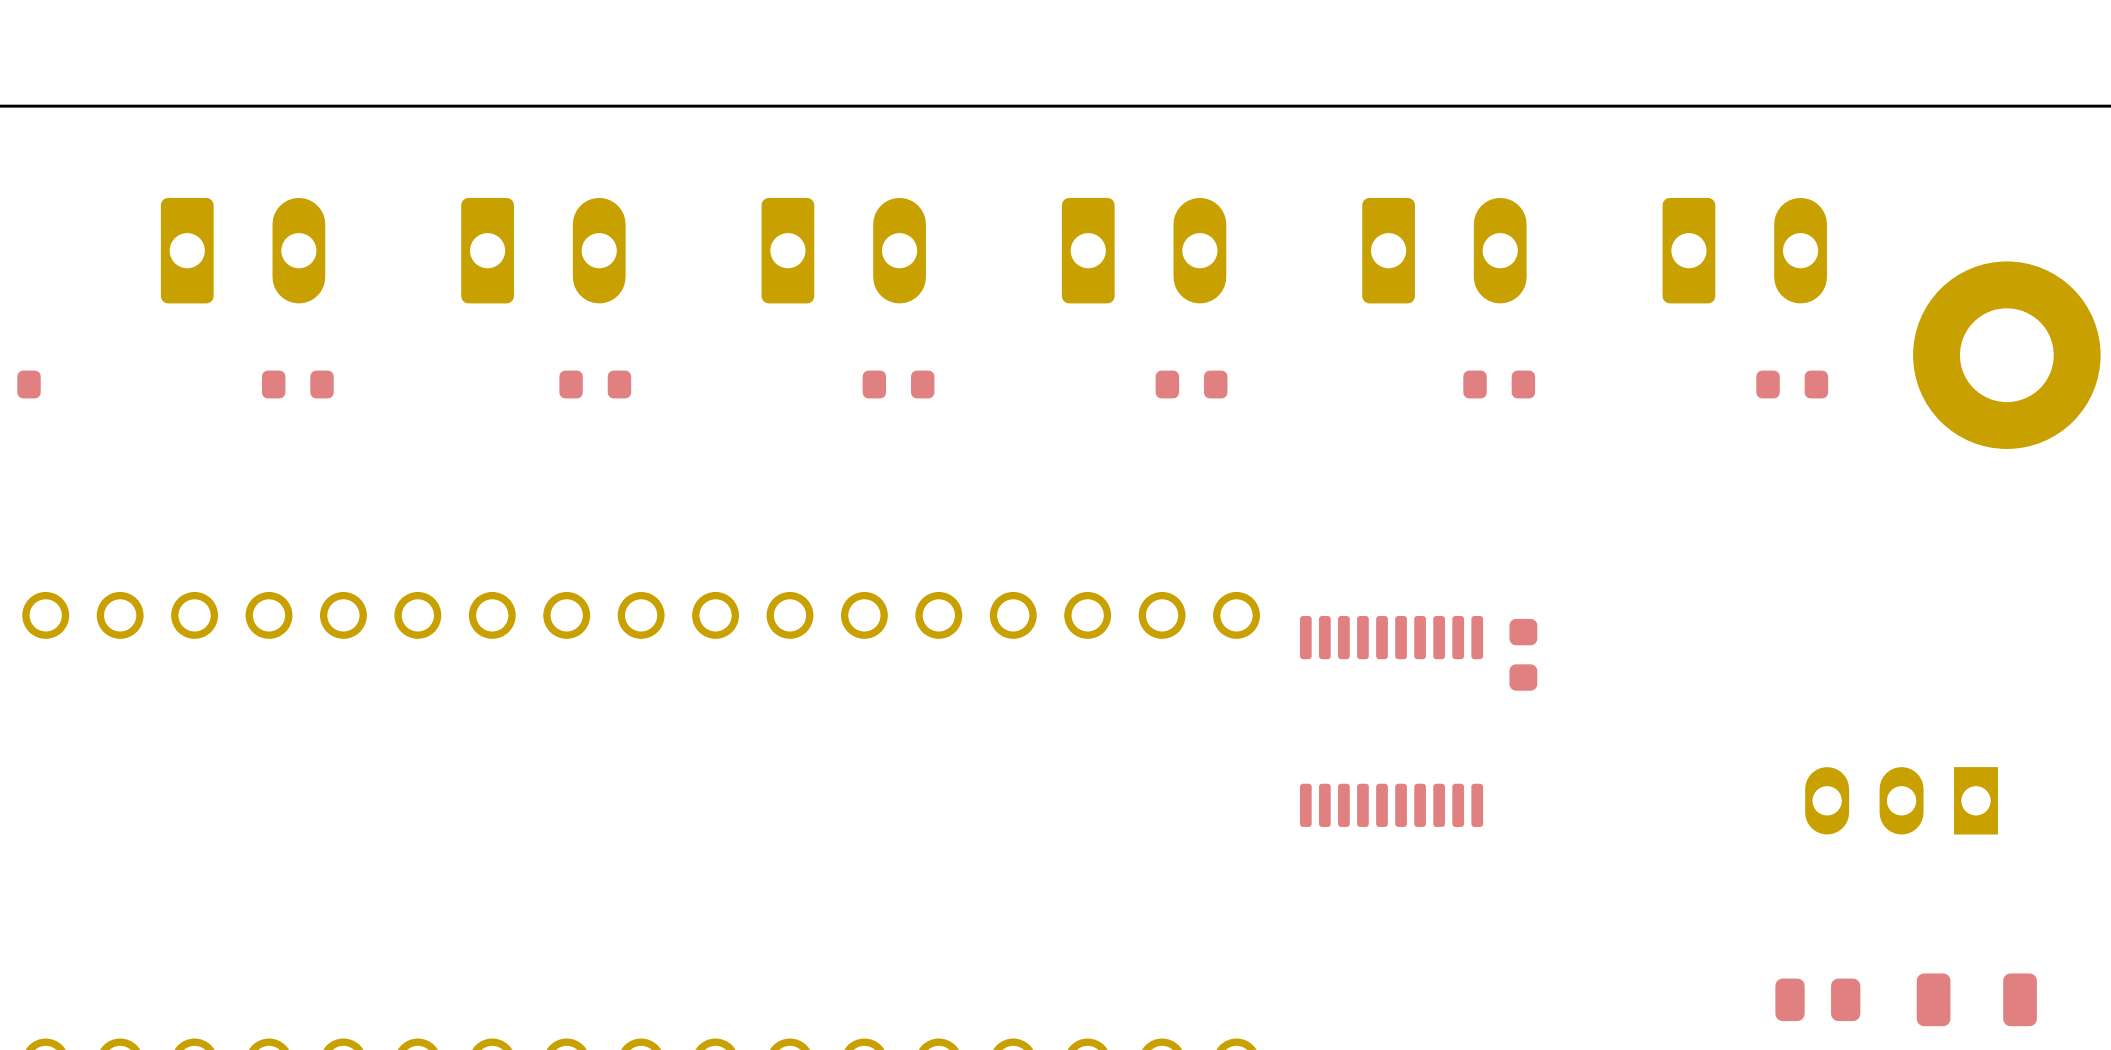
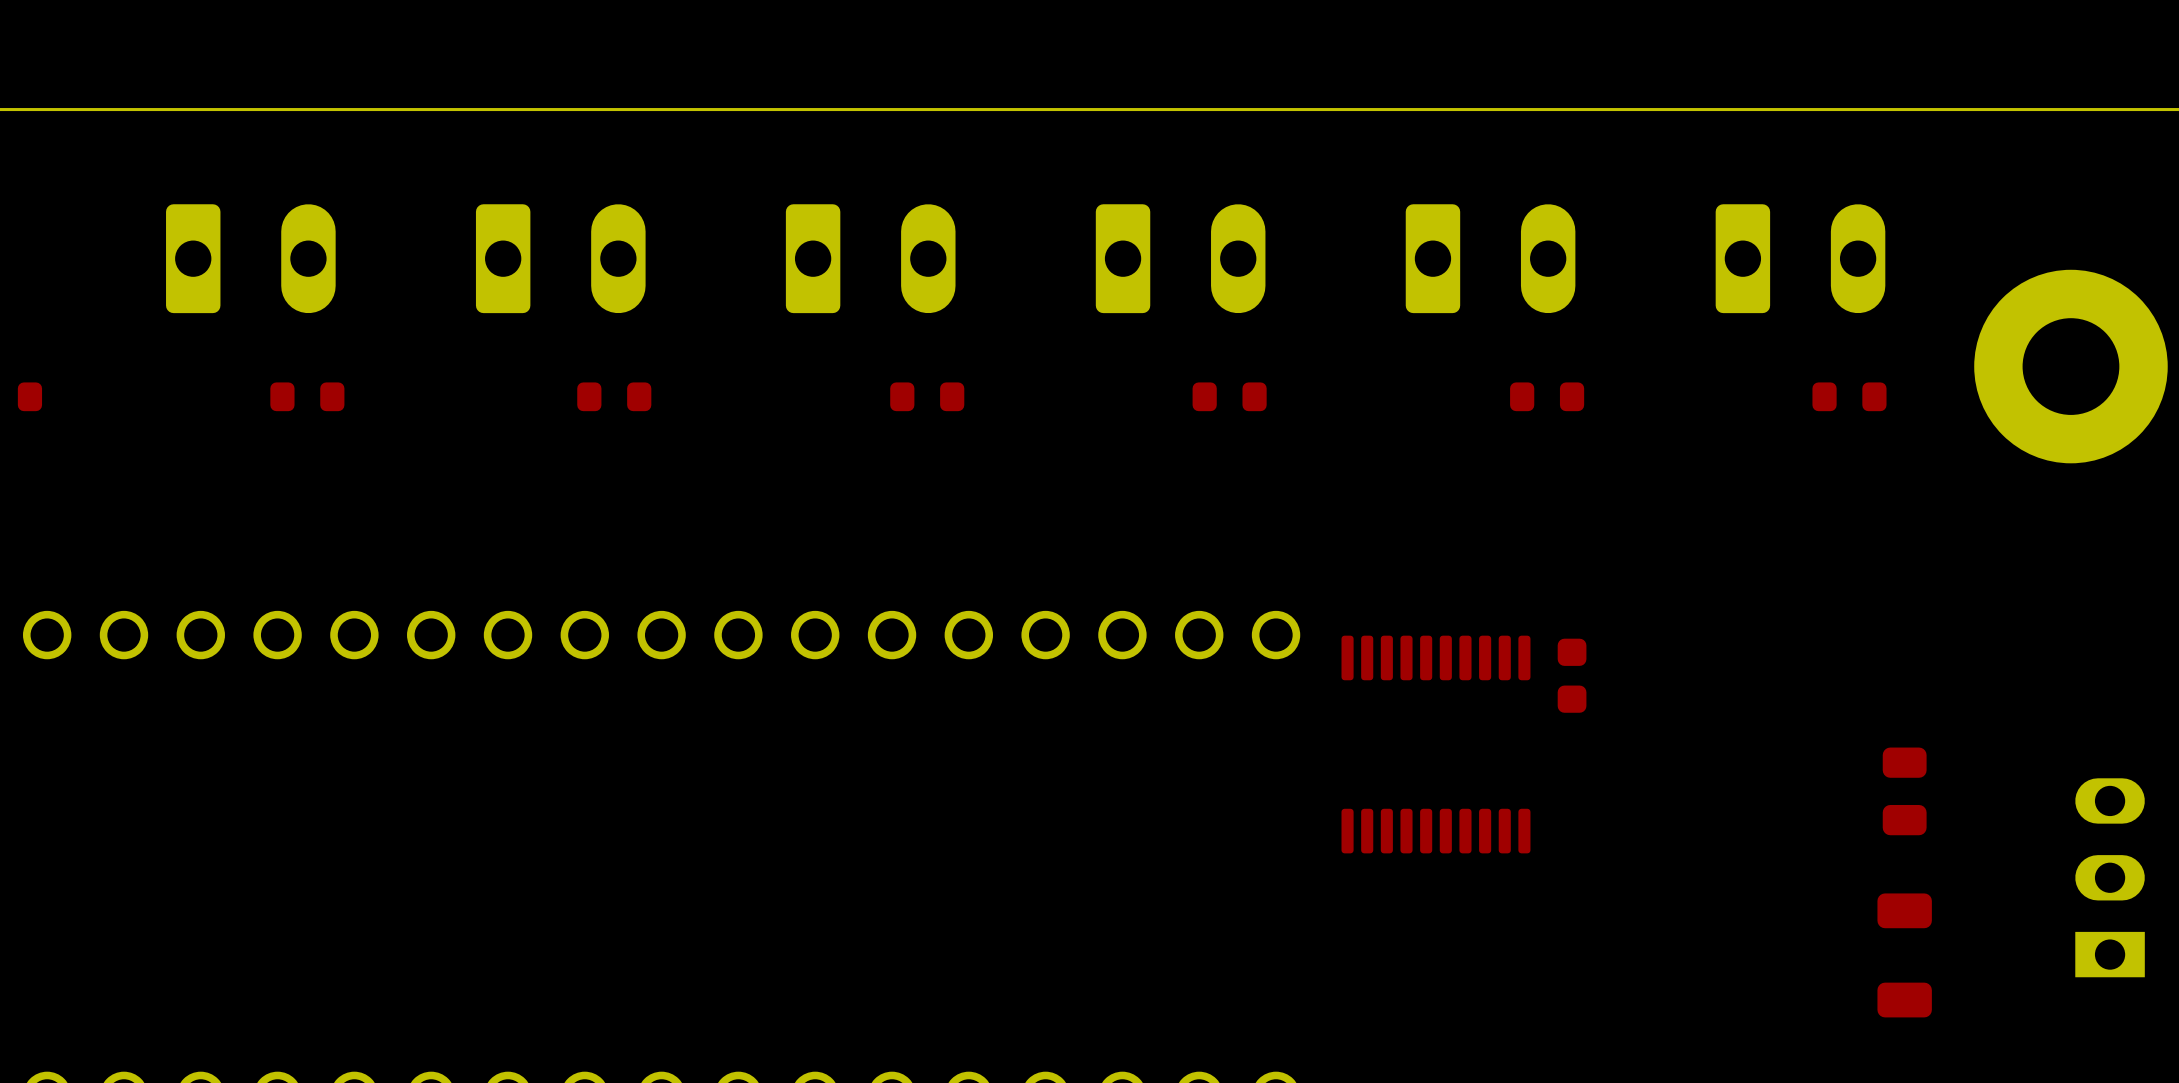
part rotation: 0° (1901, 800) -> 90° clockwise (2110, 877)
part position: (1901, 800) -> (2110, 877)
part rotation: 0° (1817, 999) -> 90° clockwise (1904, 791)
part position: (1817, 999) -> (1904, 791)
part rotation: 0° (1976, 999) -> 90° clockwise (1904, 955)
part position: (1976, 999) -> (1904, 955)

